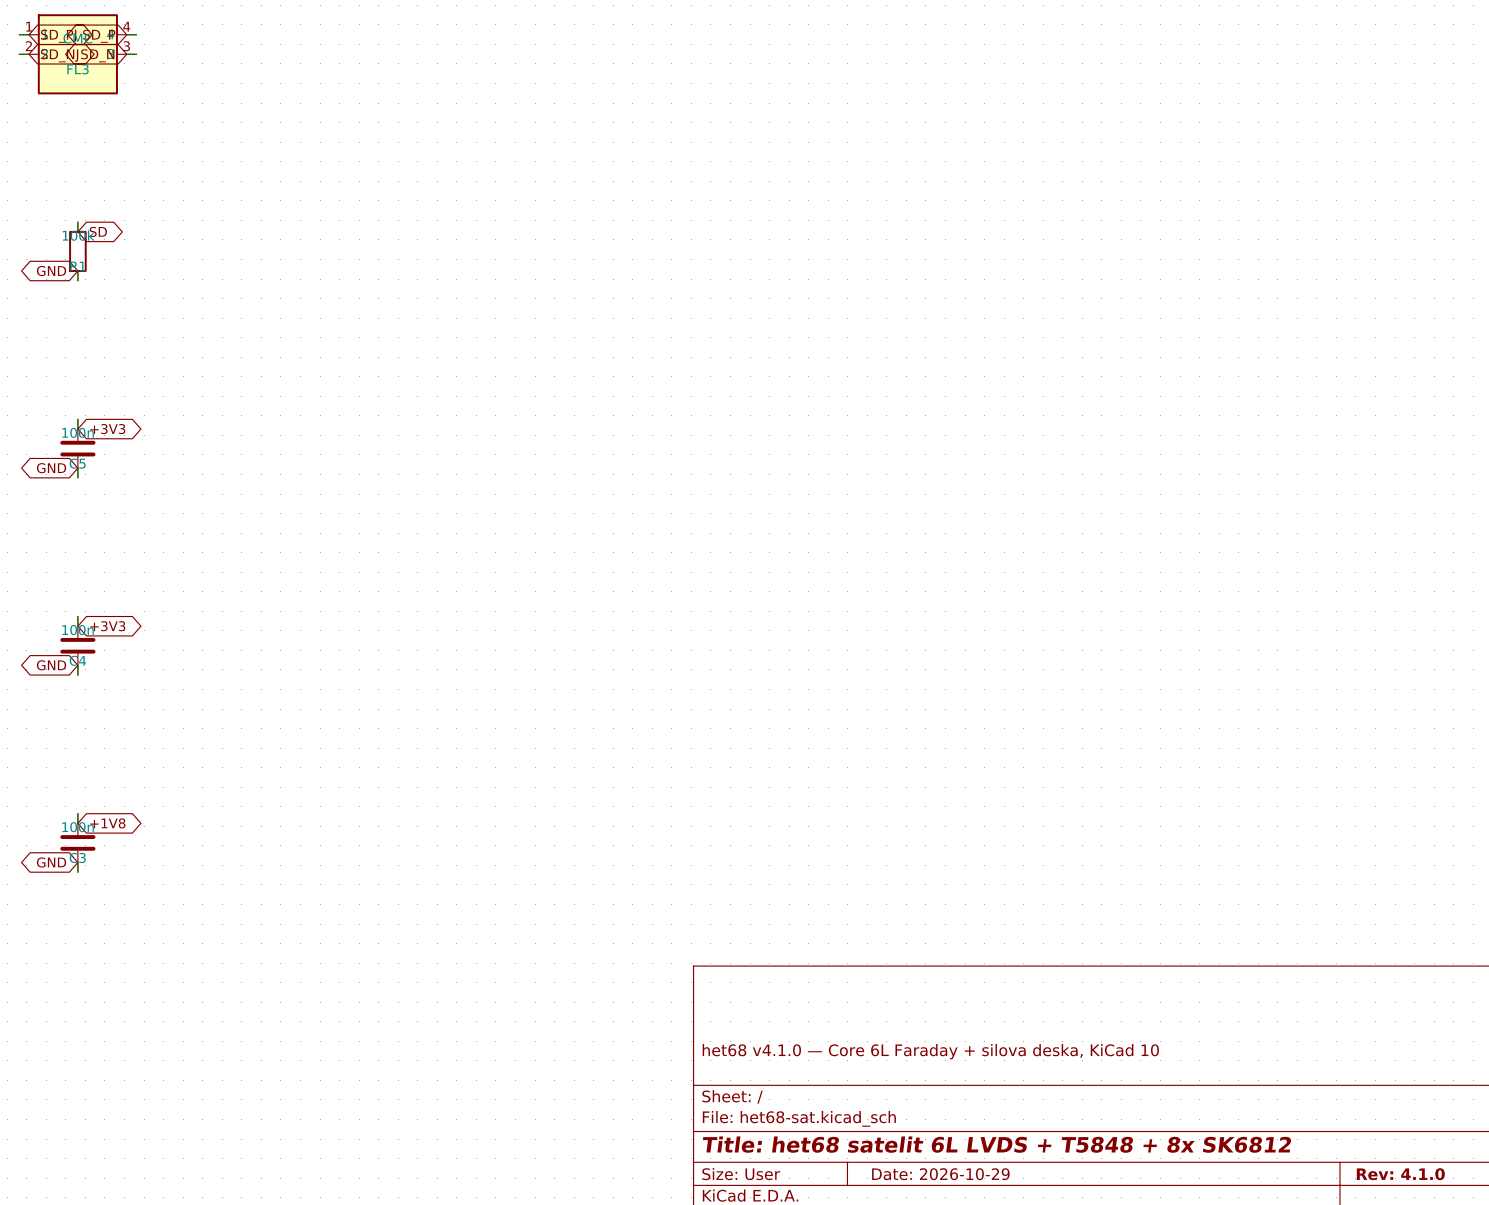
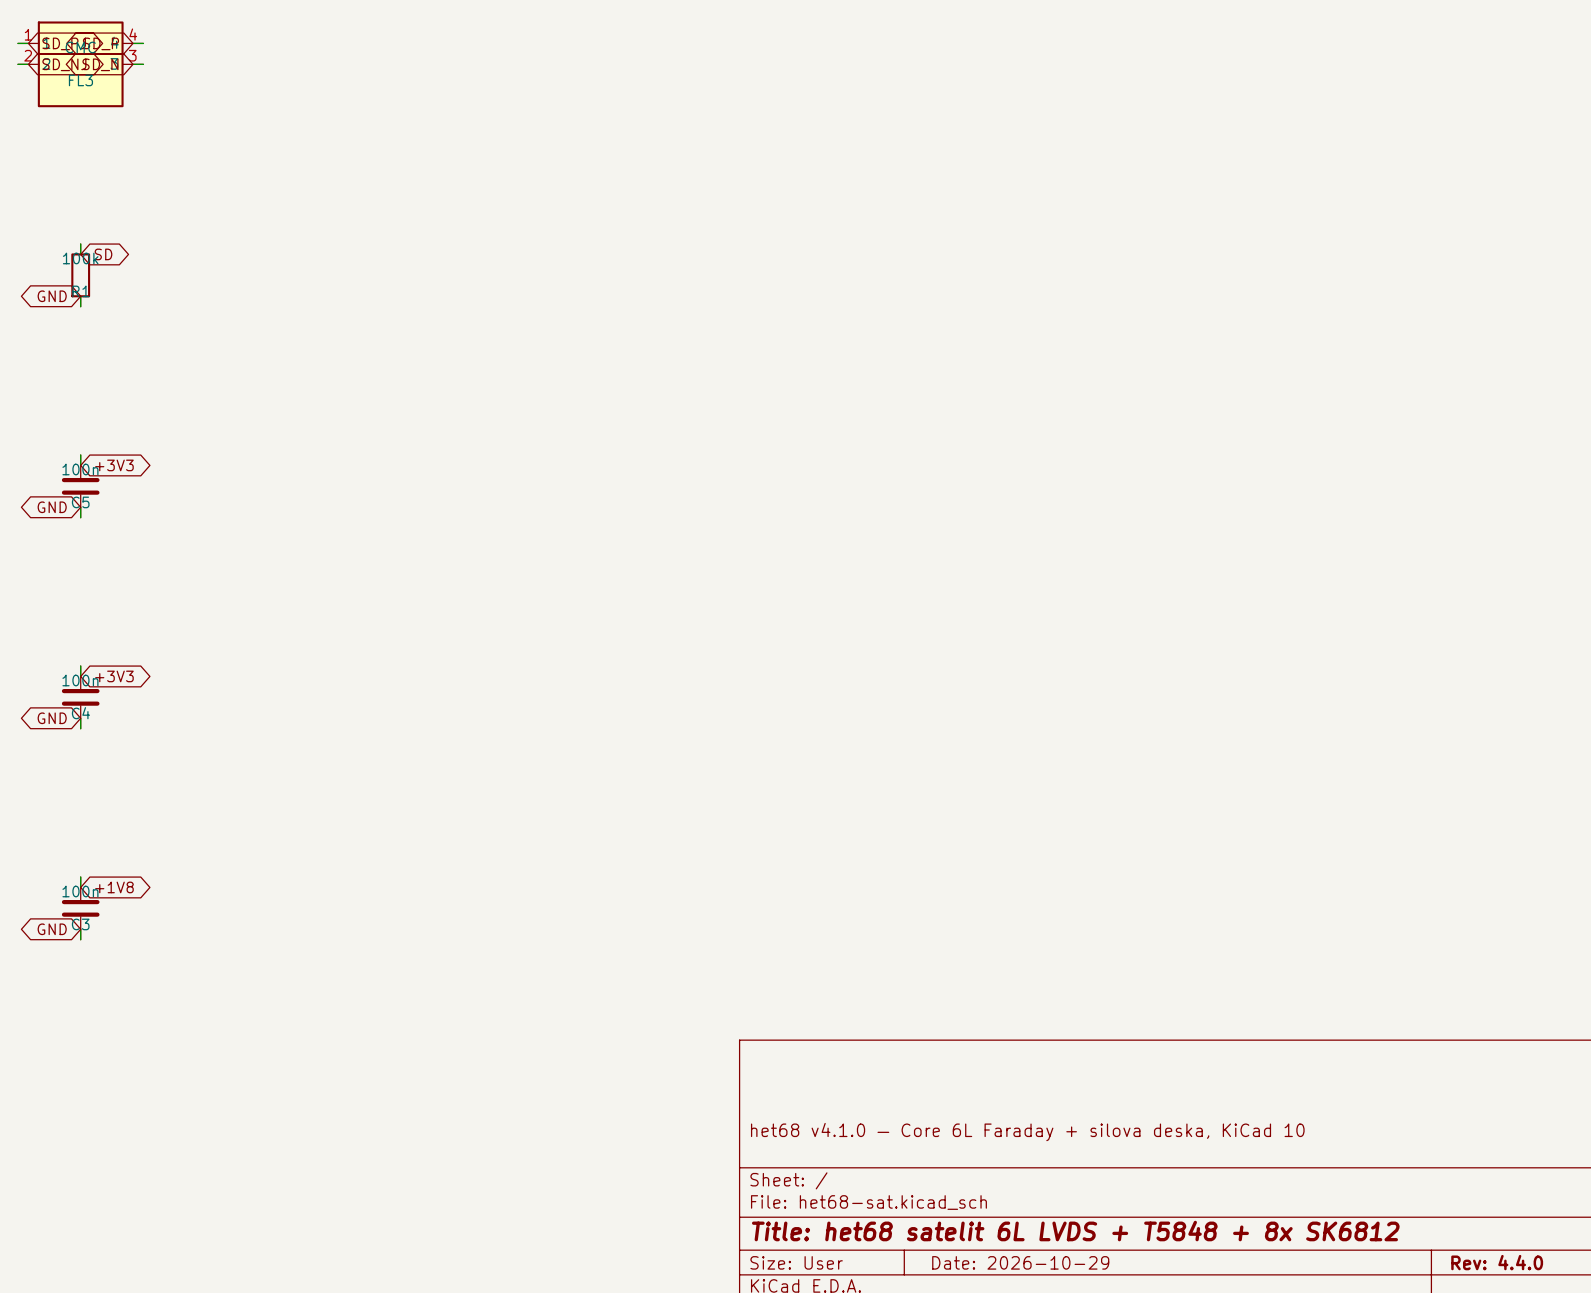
title block: Rev: 4.1.0 (1400, 1174) -> Rev: 4.4.0 (1497, 1262)

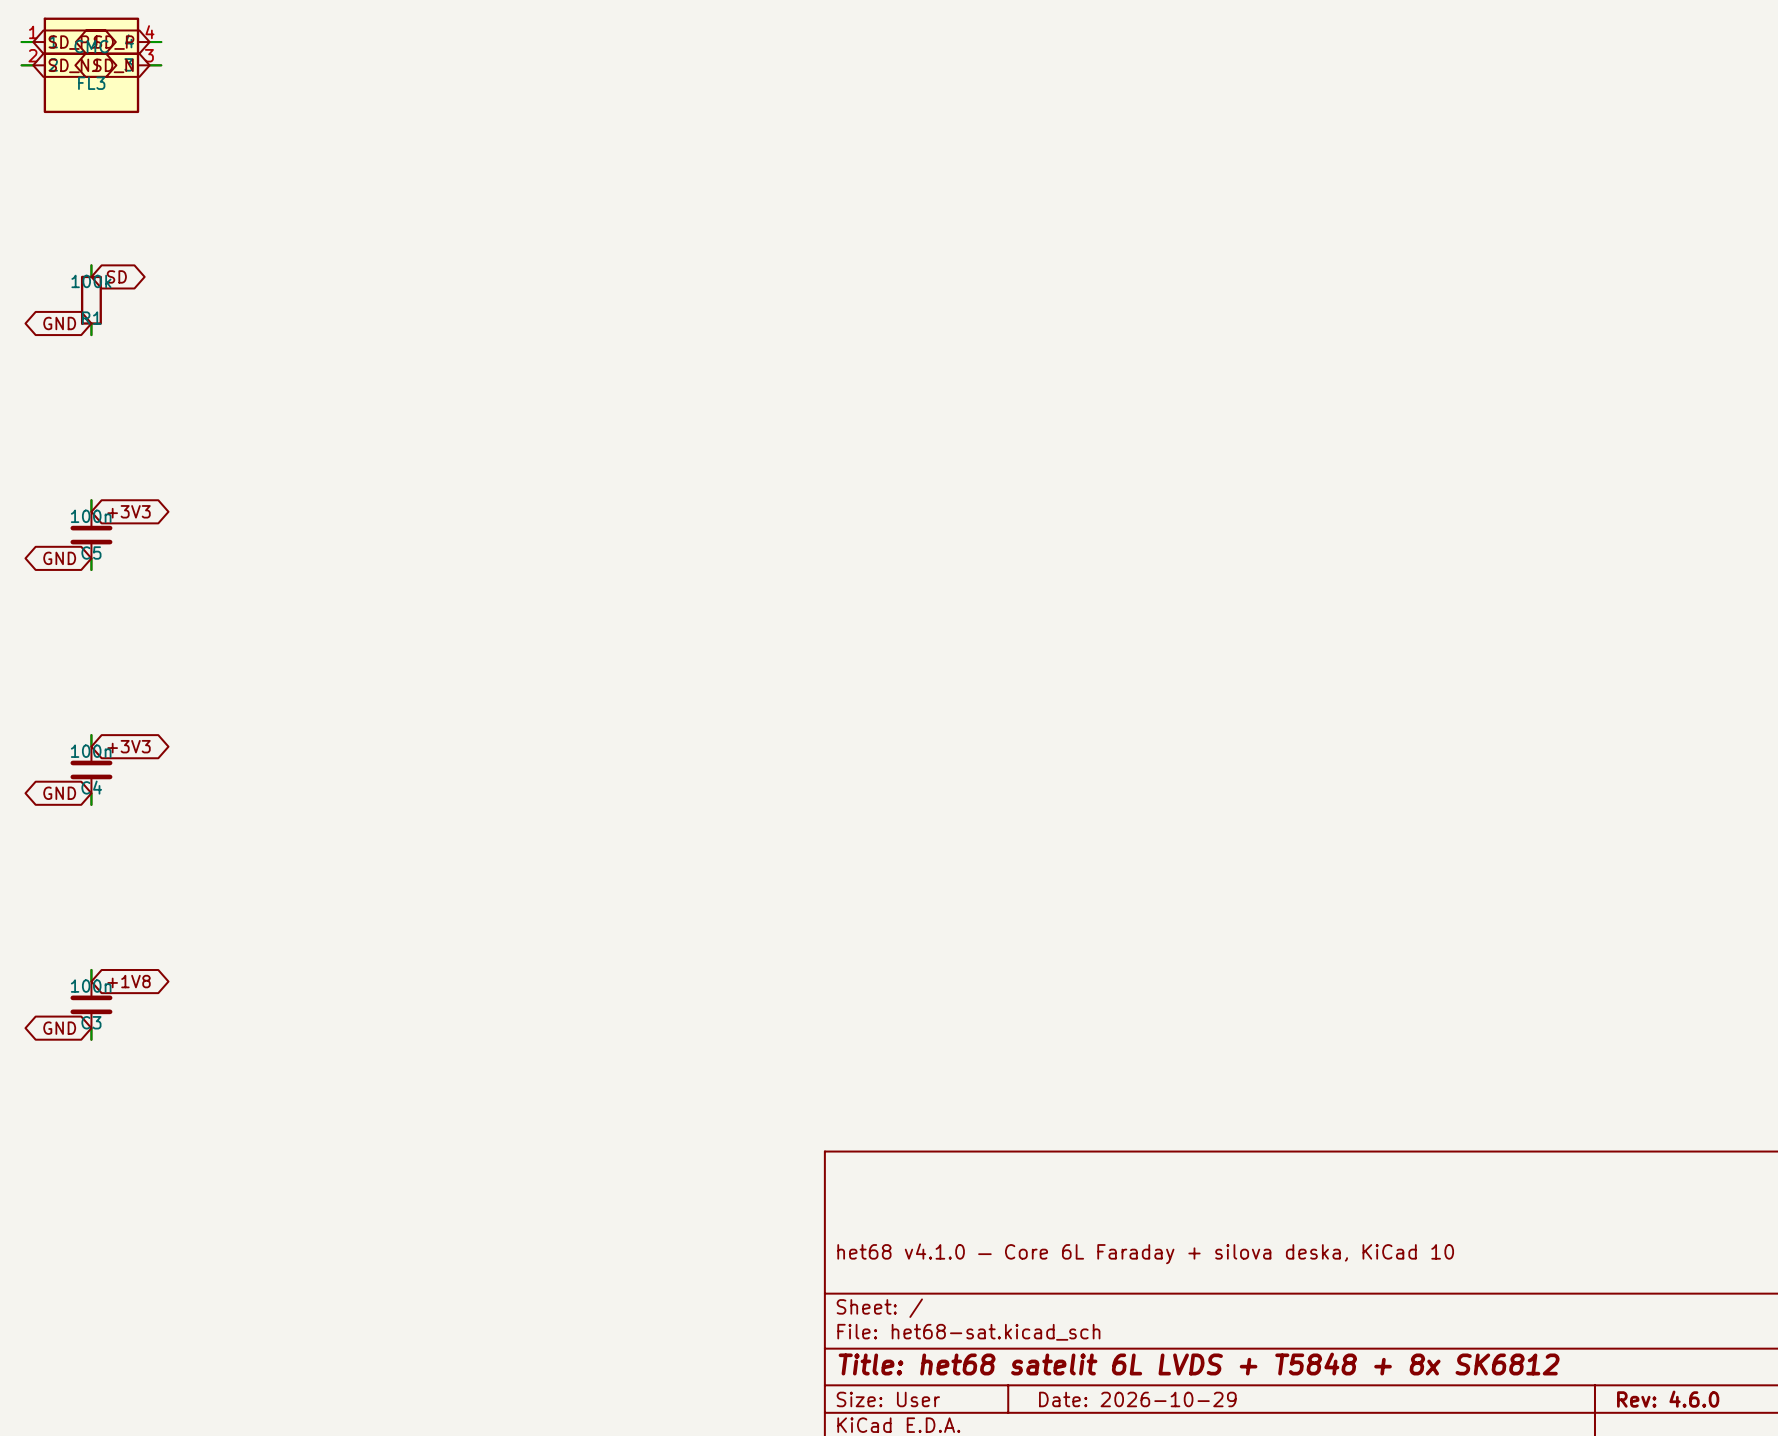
title block: Rev: 4.4.0 (1497, 1262) -> Rev: 4.6.0 (1668, 1399)

